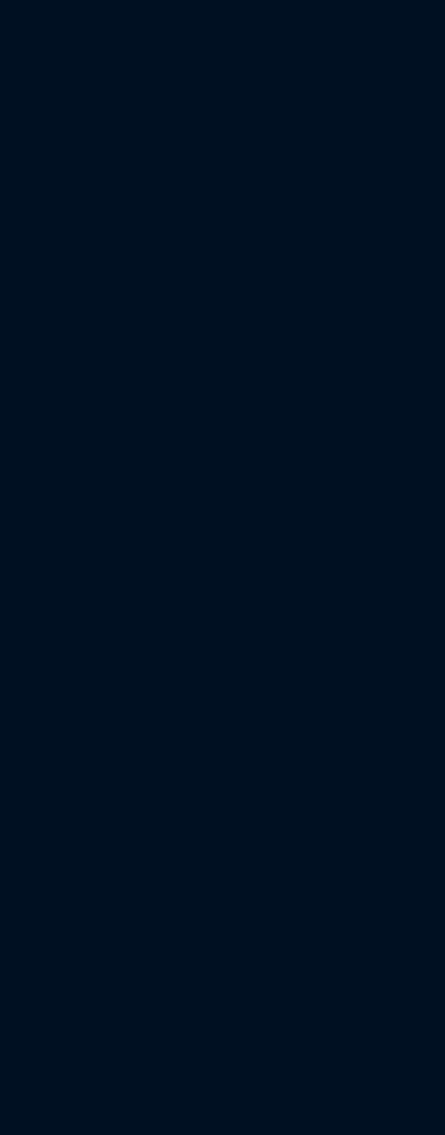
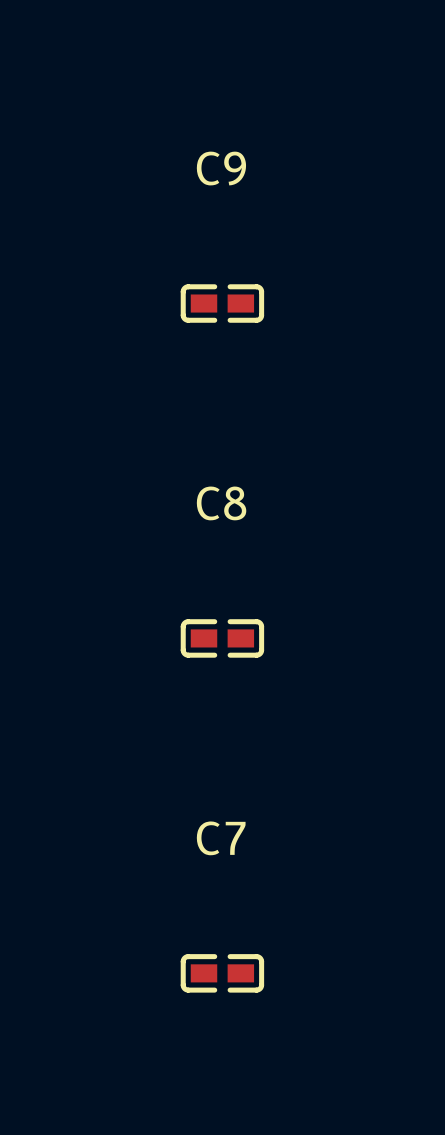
C9: none -> (222, 303)
C8: none -> (222, 638)
C7: none -> (222, 973)

